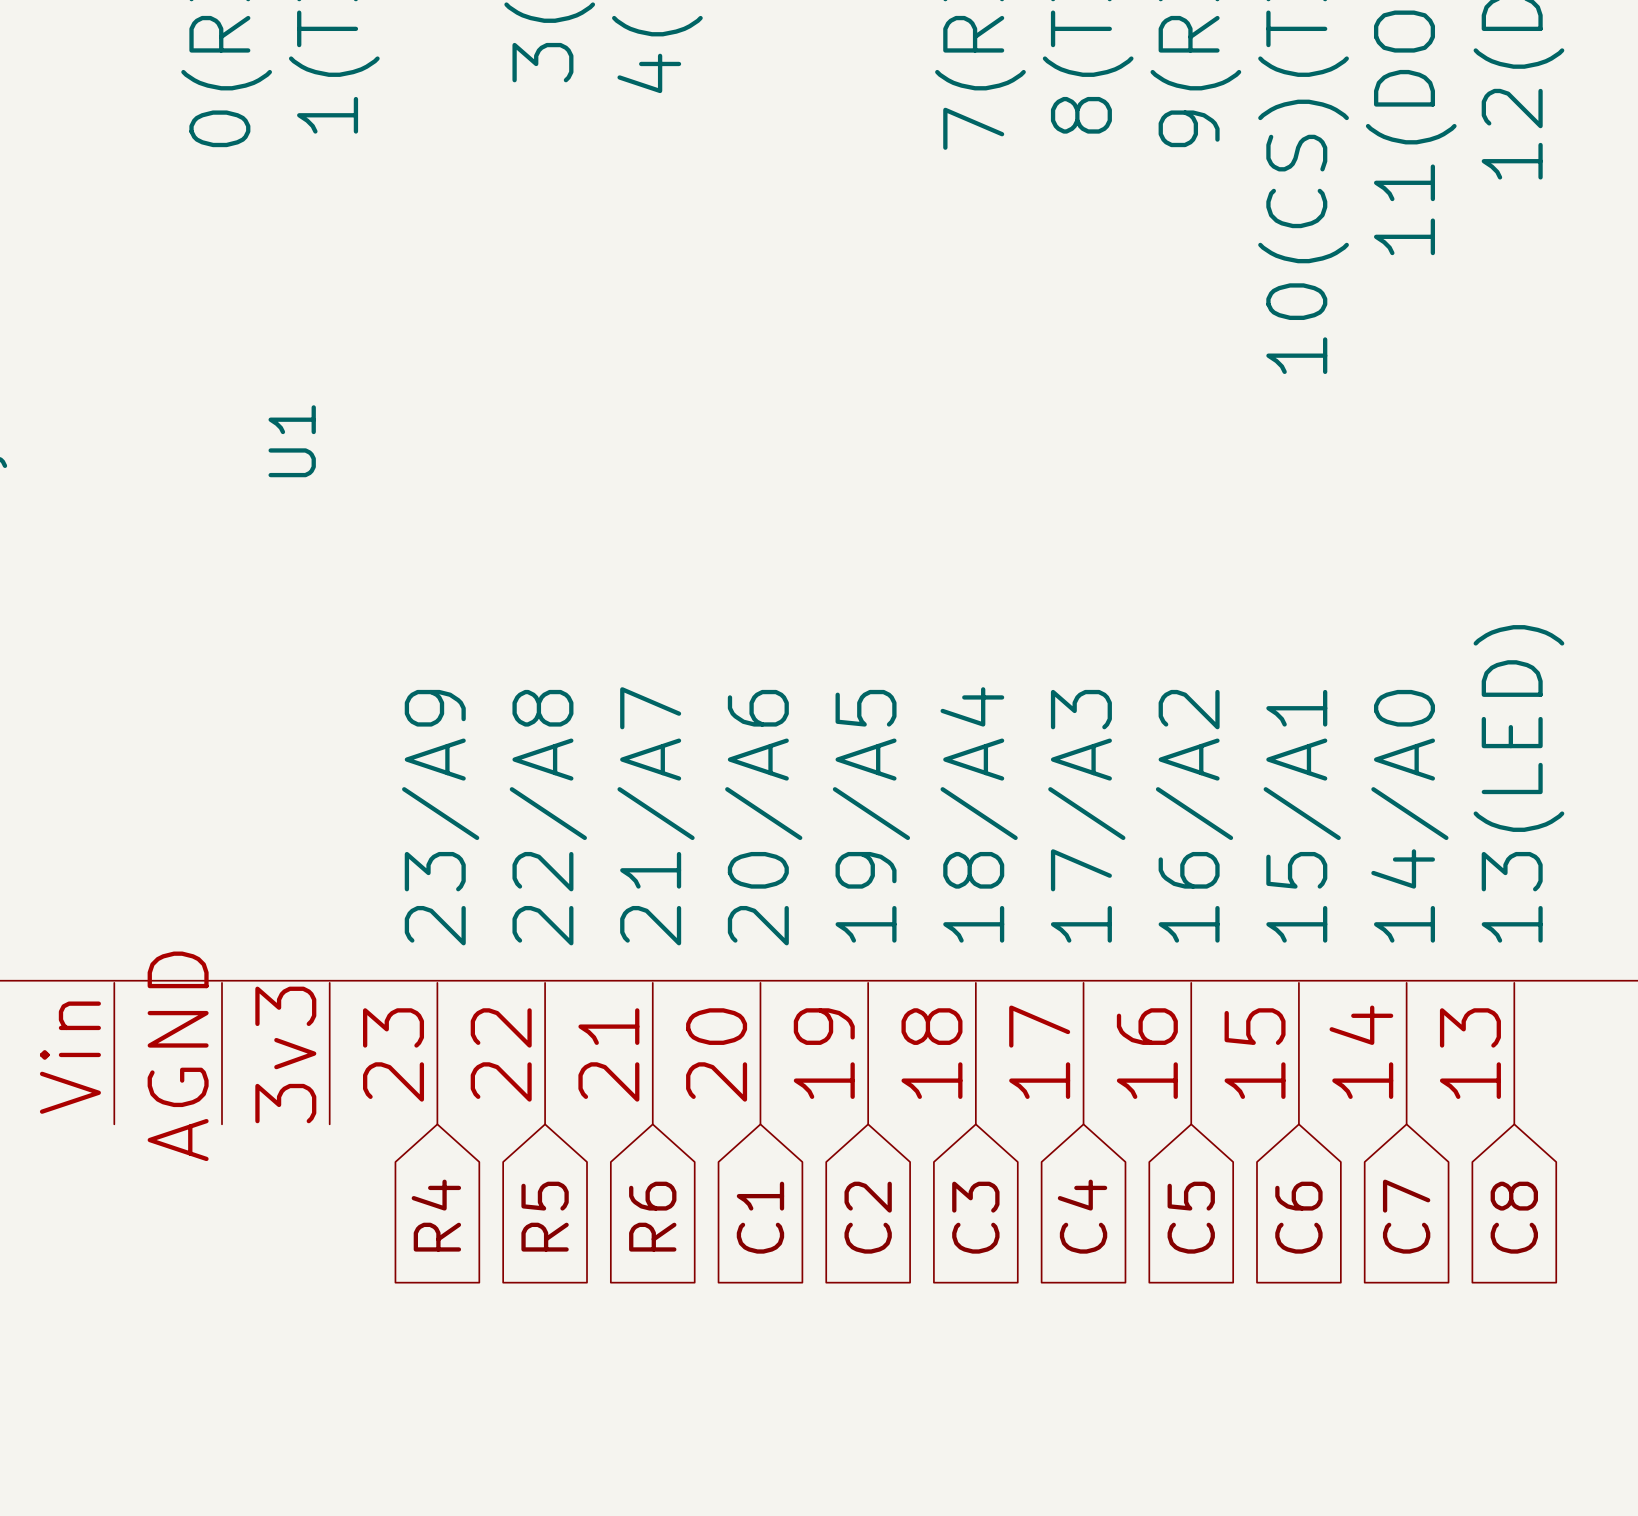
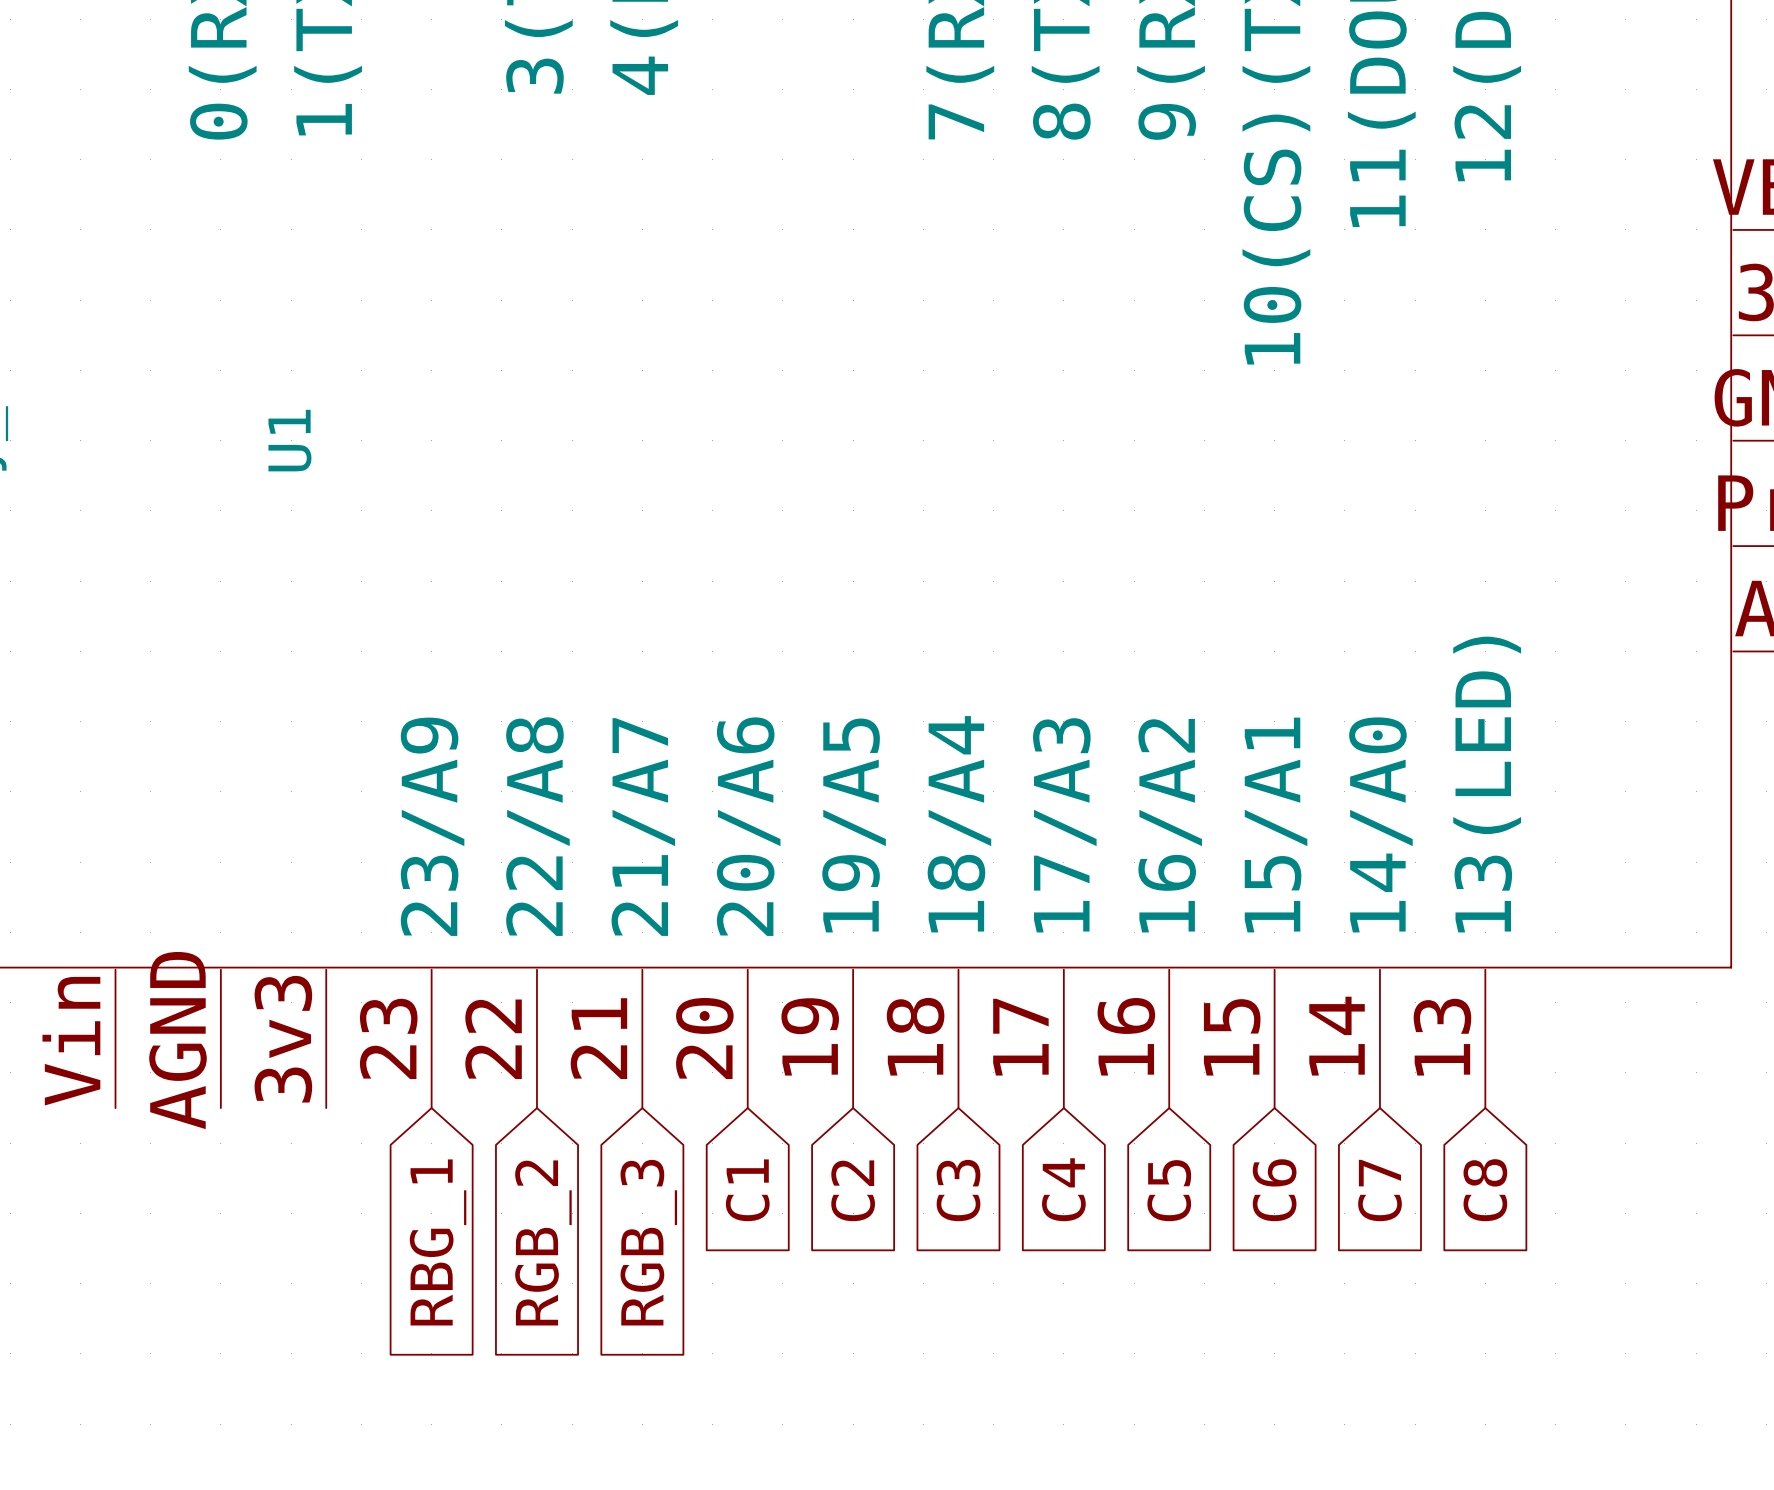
global label: R4 (436, 1215) -> RBG_1 (438, 1242)
global label: R5 (545, 1216) -> RGB_2 (543, 1242)
global label: R6 (652, 1216) -> RGB_3 (648, 1242)

